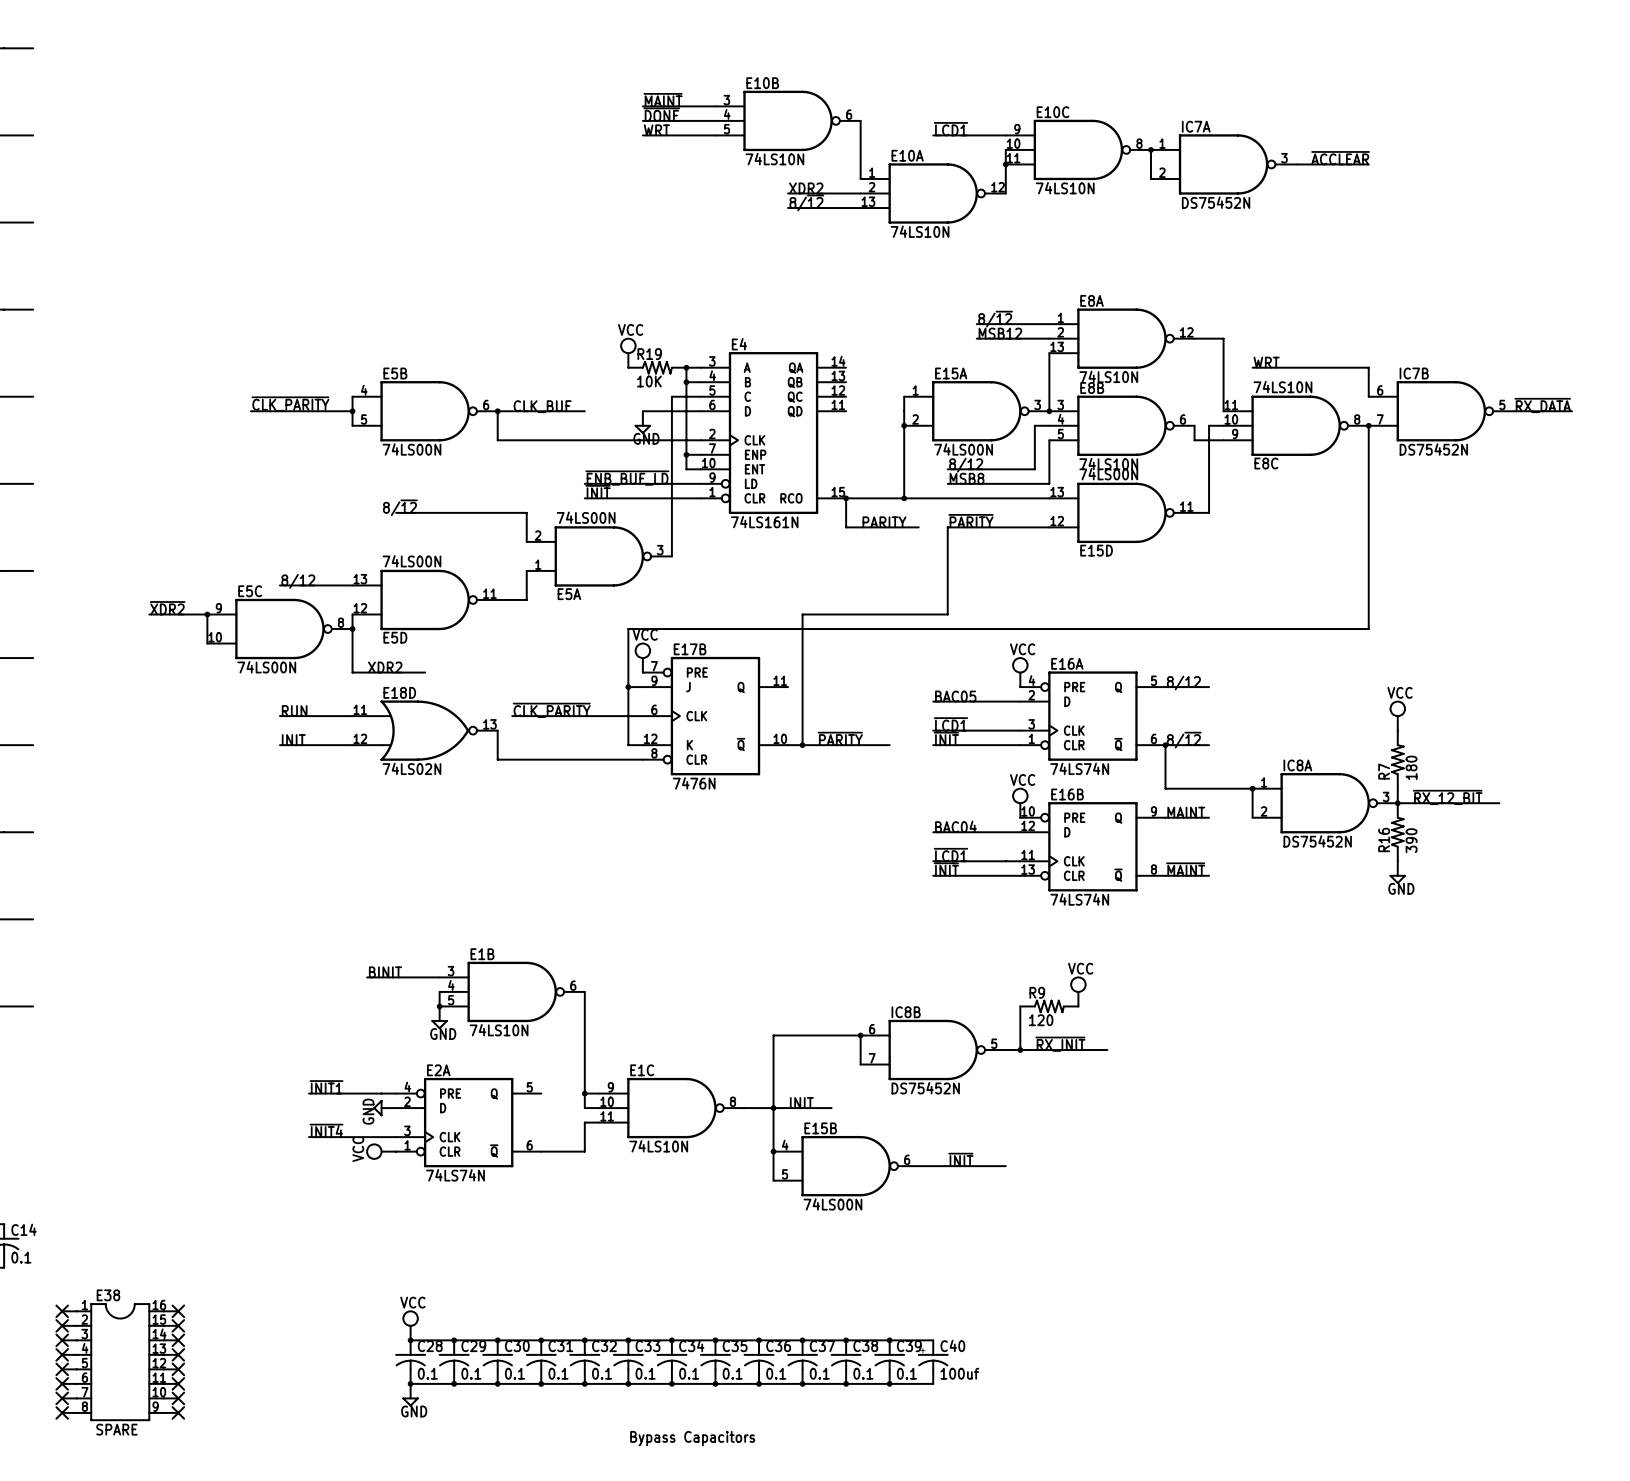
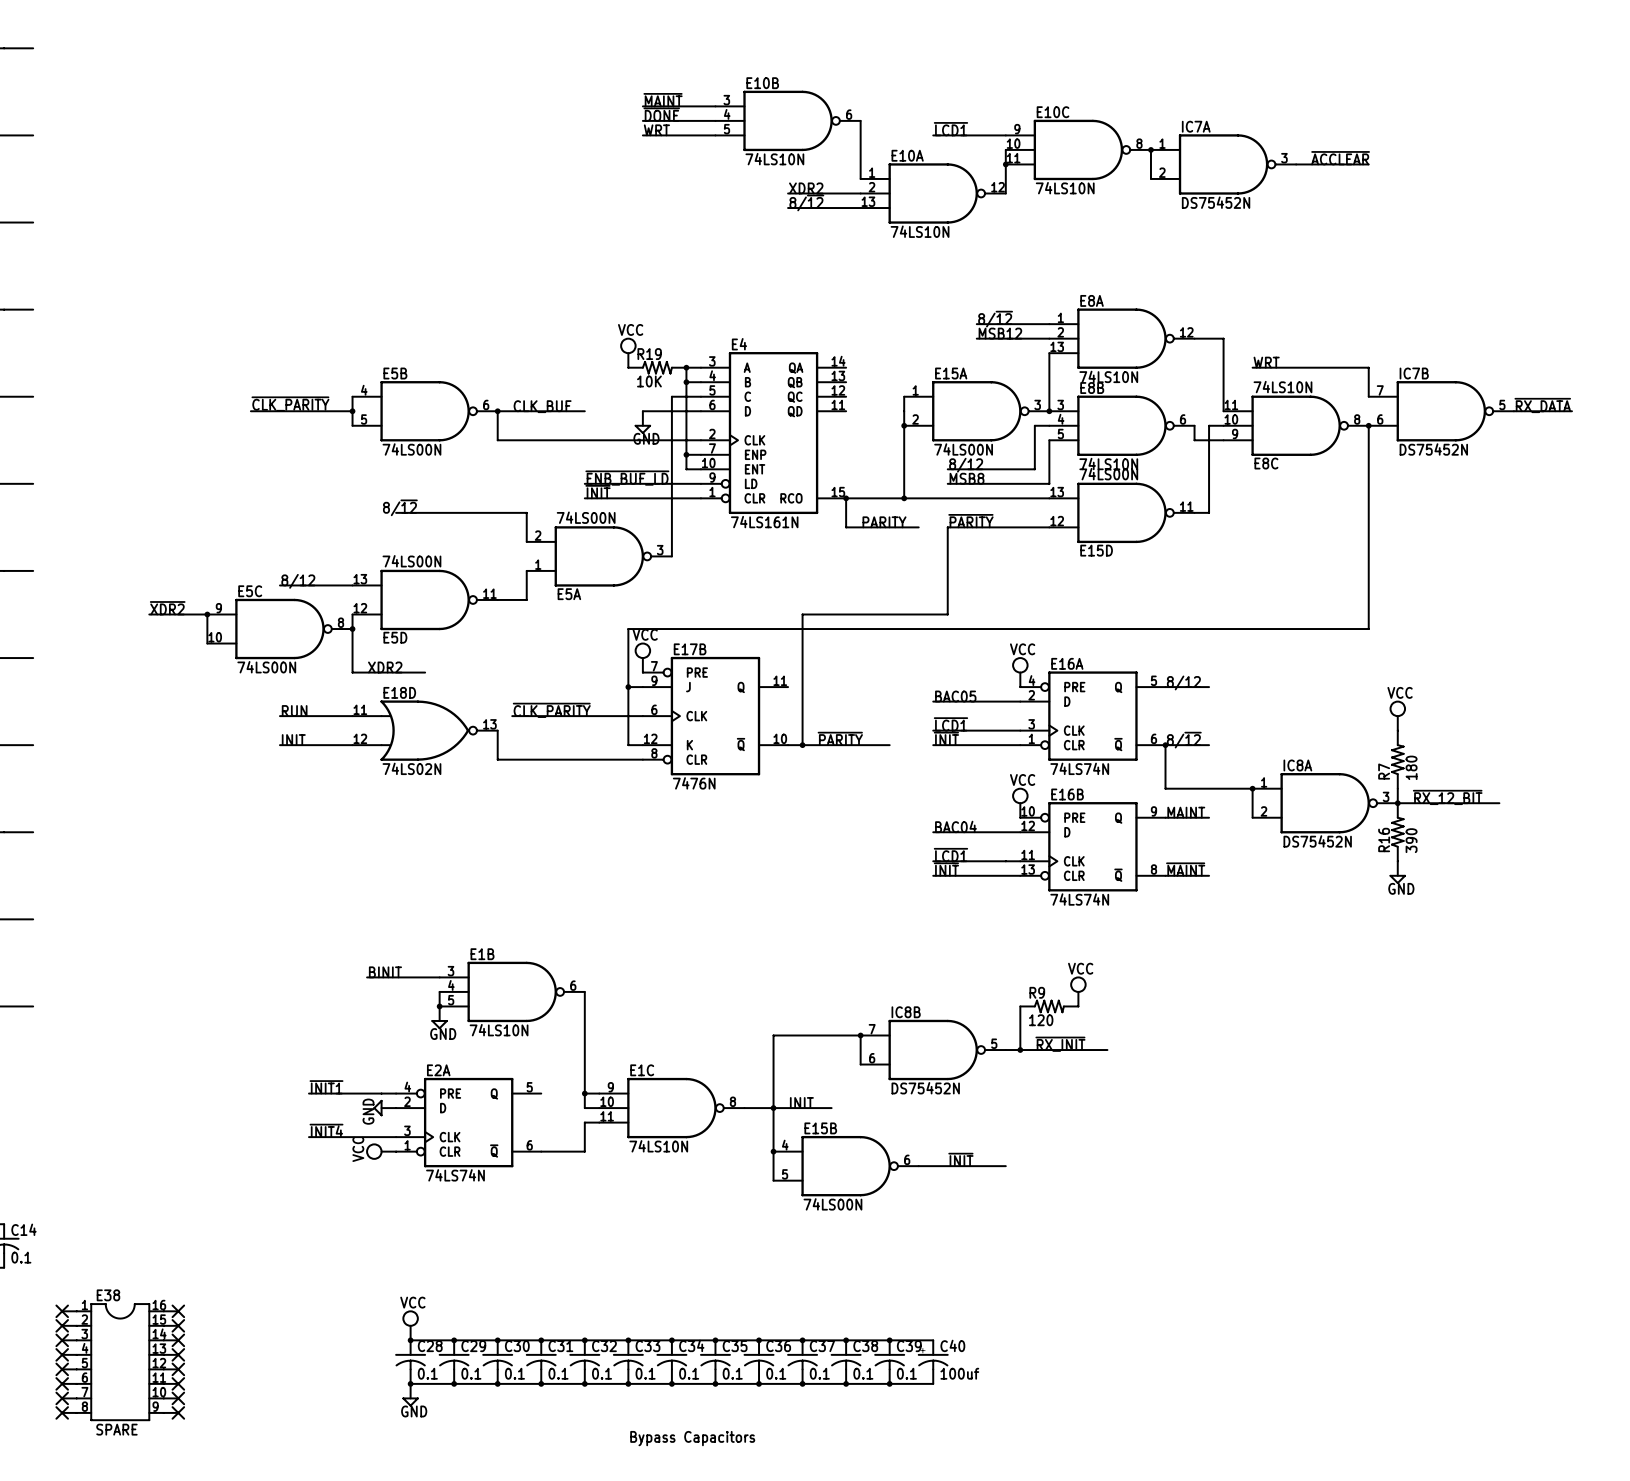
IC7B flip: as is (1441, 411) -> up-down (1441, 411)
IC8B flip: as is (933, 1050) -> up-down (933, 1050)

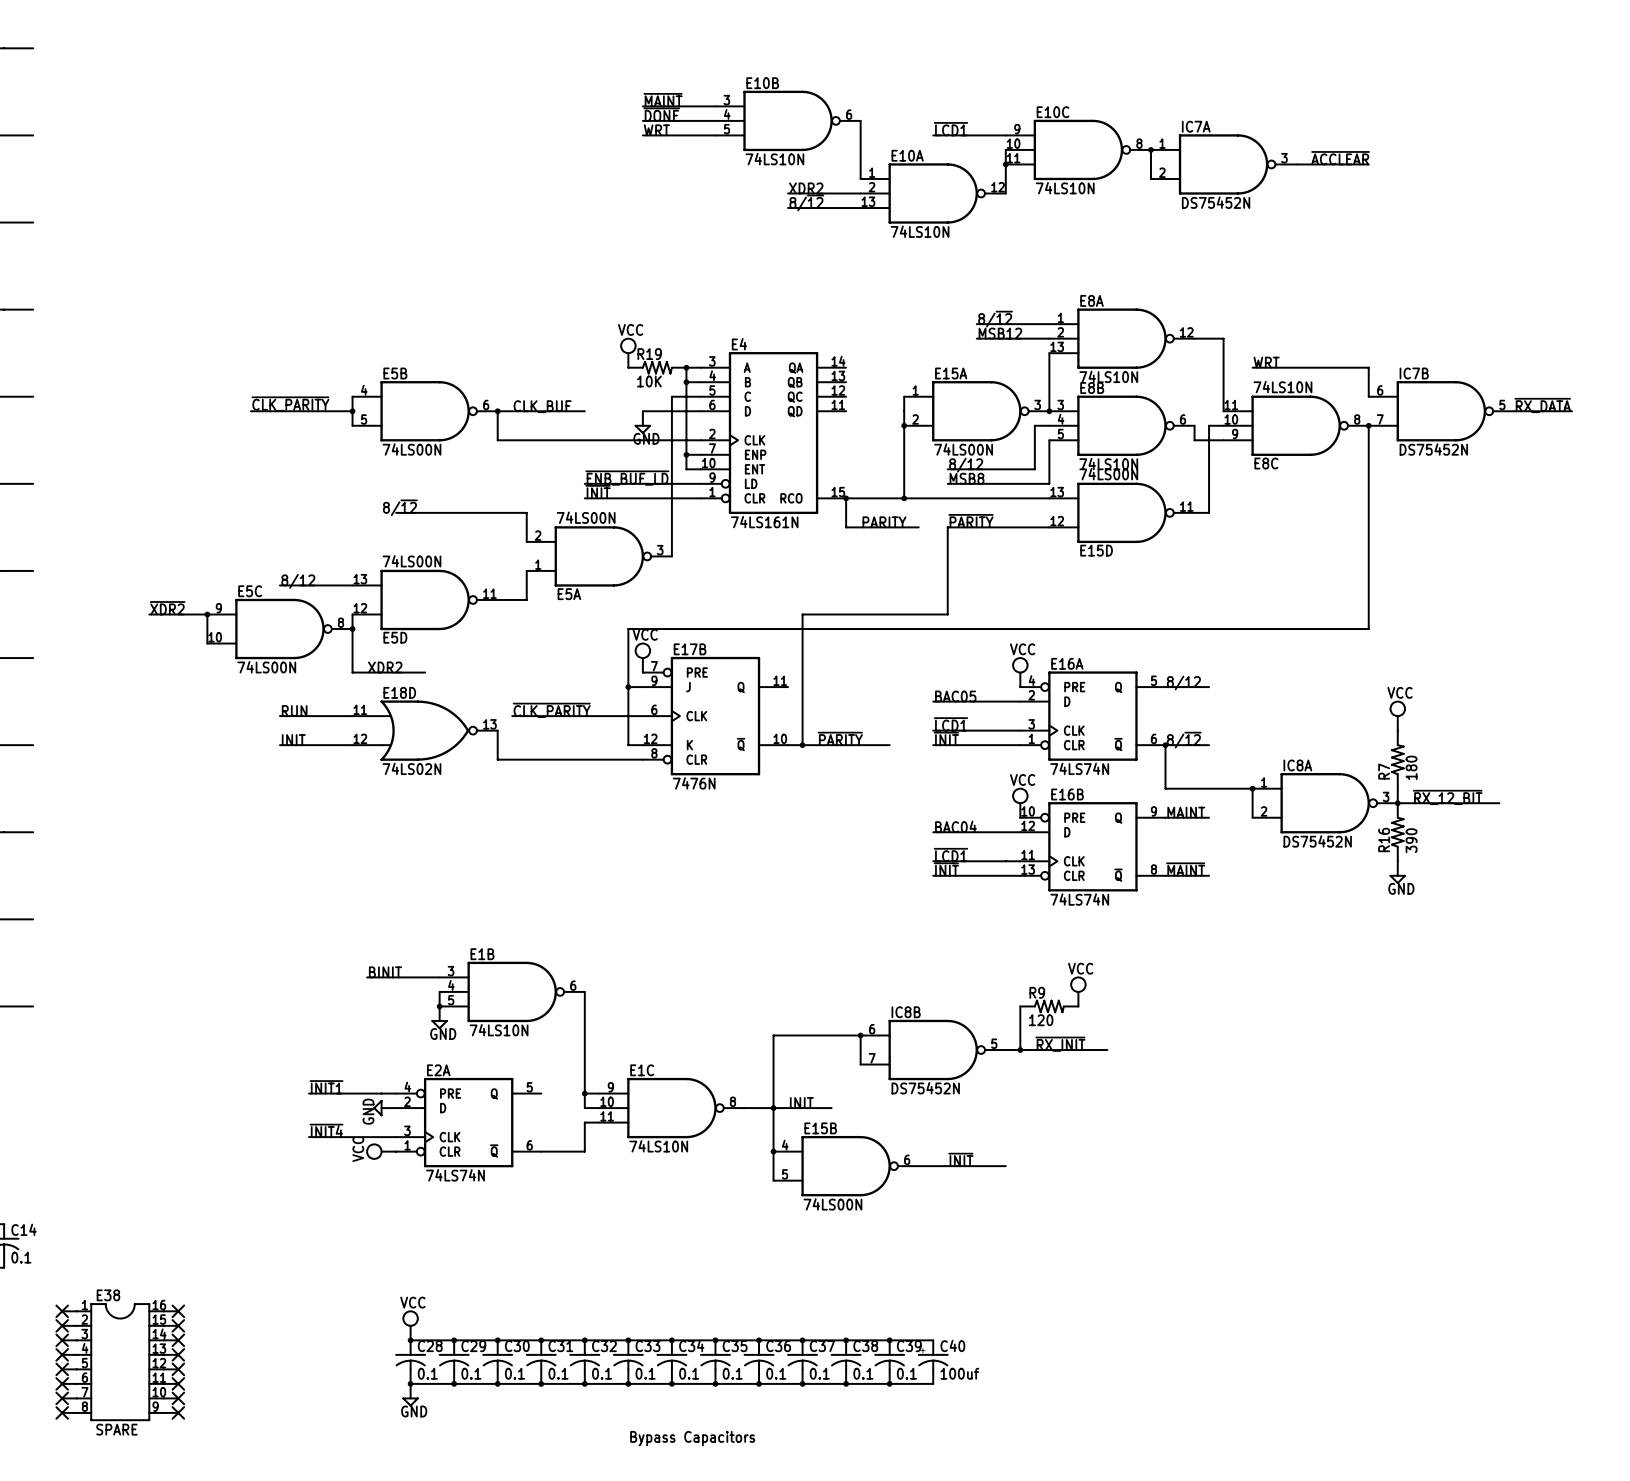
IC7B flip: as is (1441, 411) -> up-down (1441, 411)
IC8B flip: as is (933, 1050) -> up-down (933, 1050)

